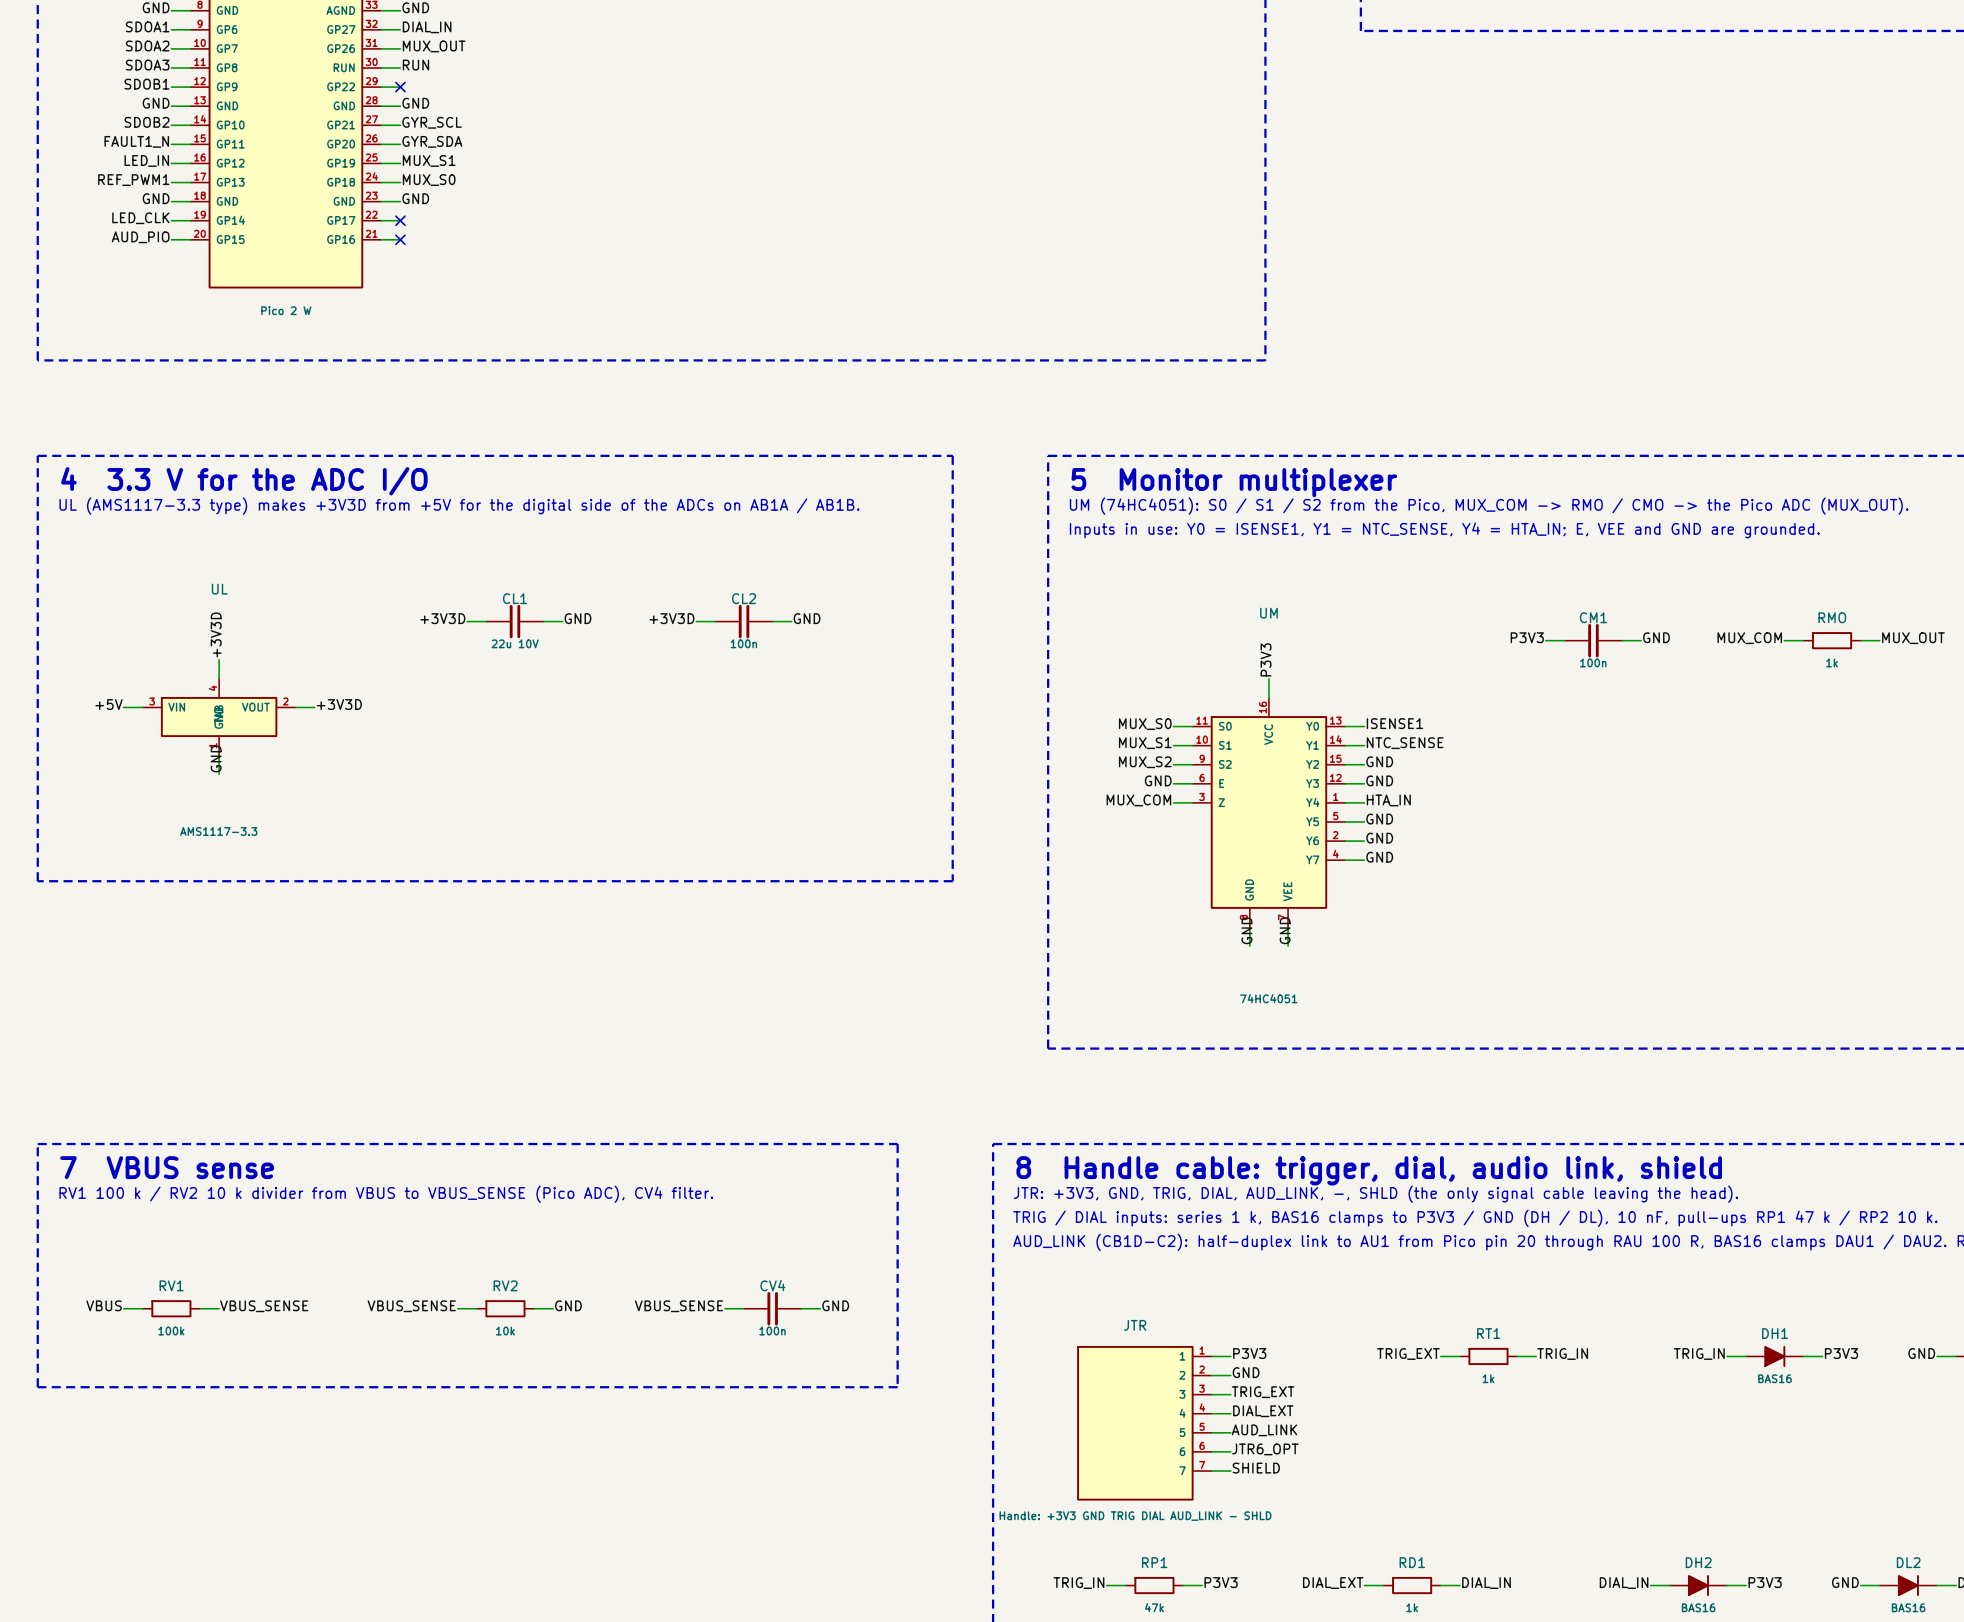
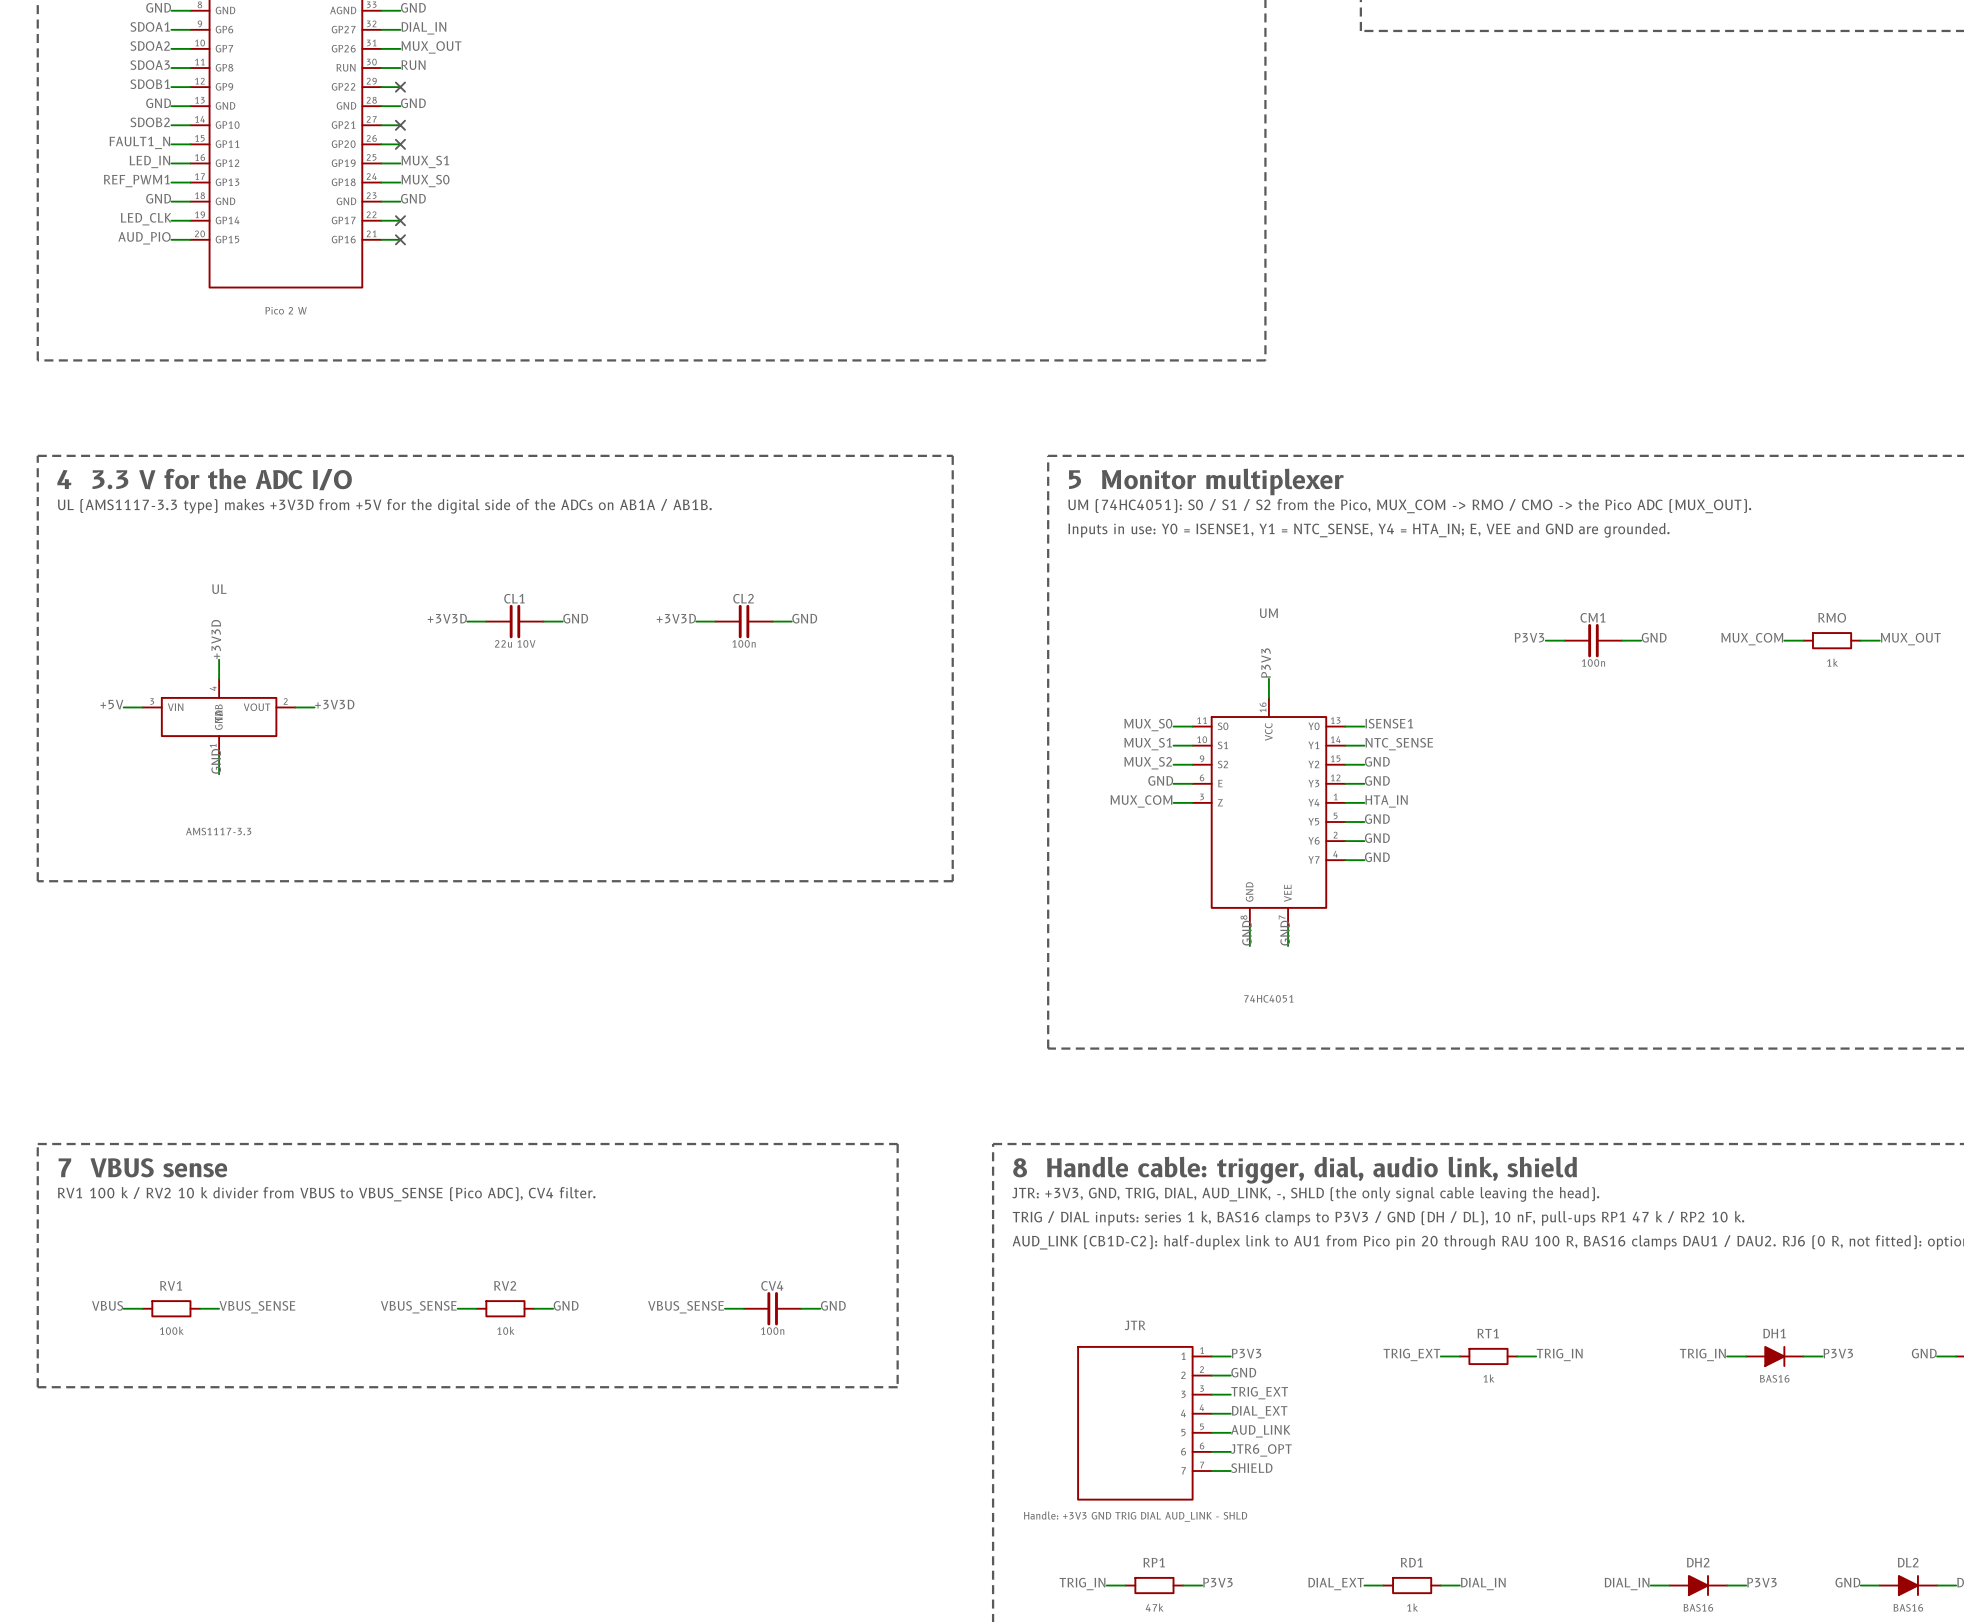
label: GYR_SCL (432, 122) -> none
no-connect mark: none -> (400, 125)
label: GYR_SDA (432, 141) -> none
no-connect mark: none -> (400, 144)

